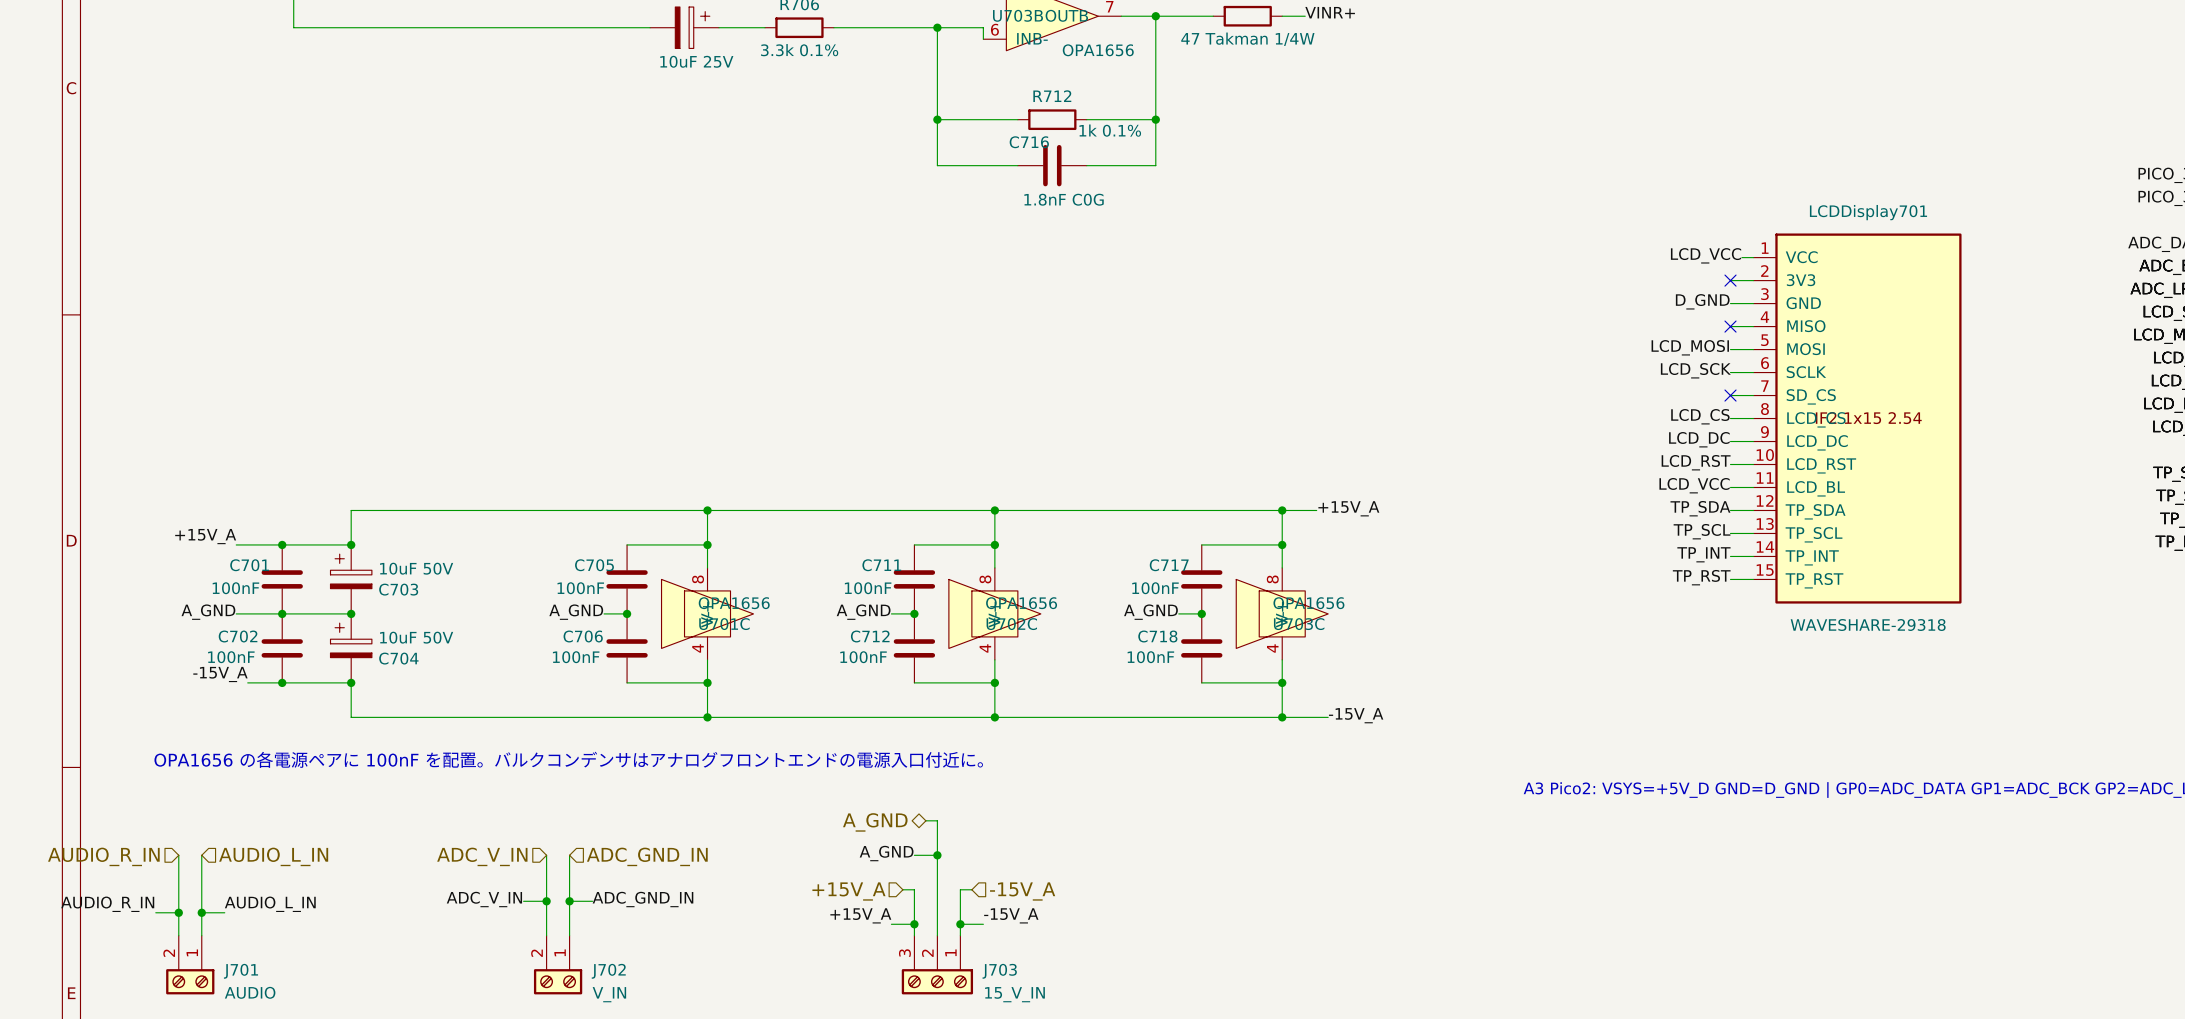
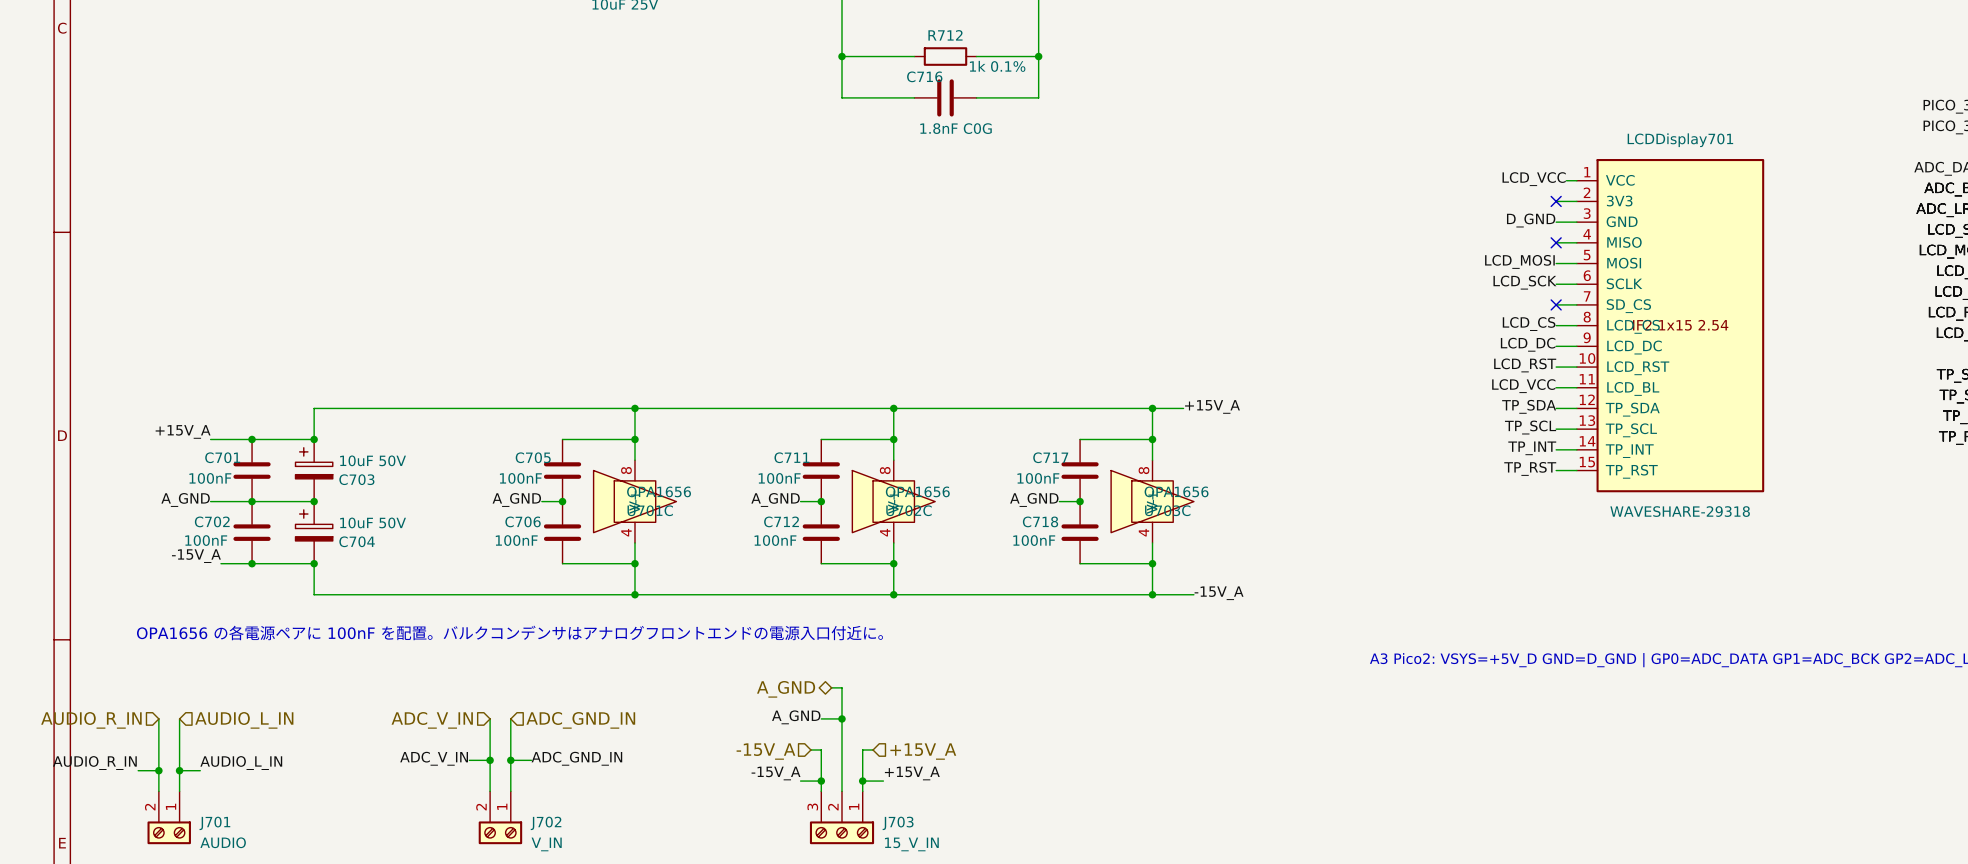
hierarchical label: +15V_A (848, 891) -> -15V_A (765, 751)
hierarchical label: -15V_A (1022, 891) -> +15V_A (923, 751)
label: +15V_A (860, 915) -> -15V_A (776, 773)
label: -15V_A (1011, 915) -> +15V_A (912, 773)

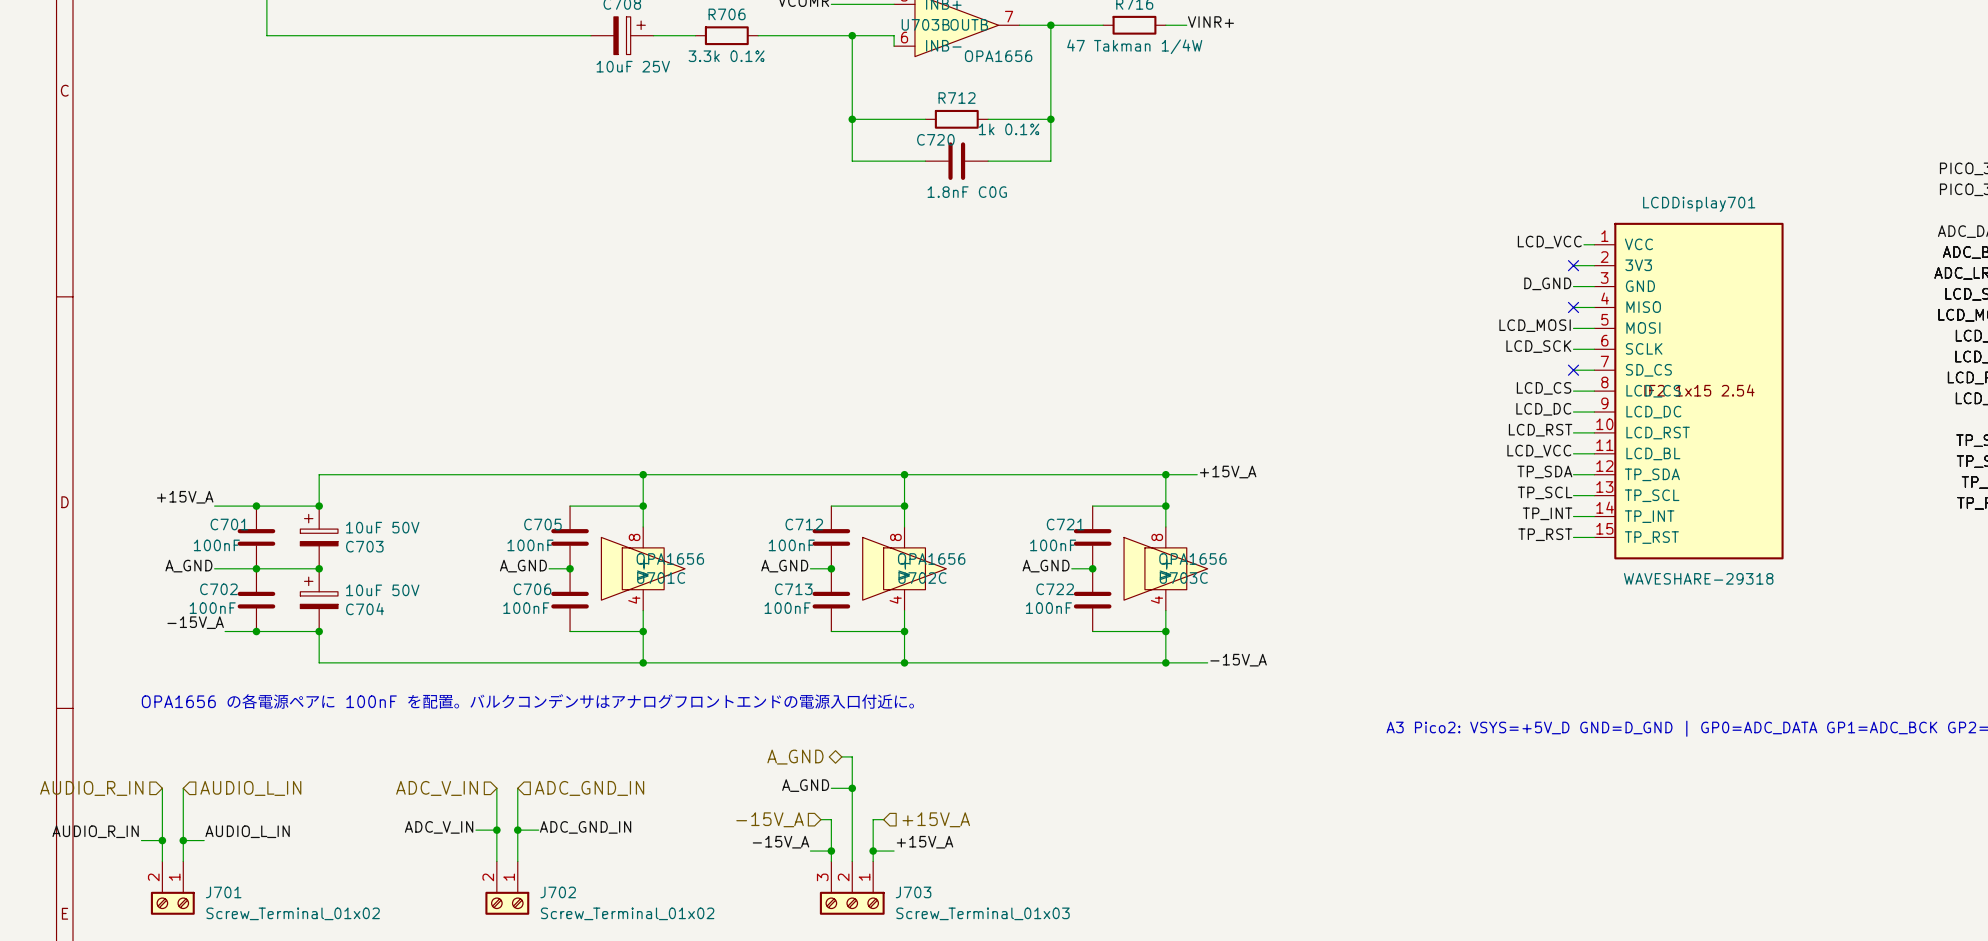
C716 name: C716 (924, 76) -> C720 (935, 139)
C711 name: C711 (791, 457) -> C712 (804, 524)
C717 name: C717 (1050, 457) -> C721 (1065, 524)
C712 name: C712 (781, 521) -> C713 (793, 589)
C718 name: C718 (1040, 521) -> C722 (1055, 589)
J701 value: AUDIO (223, 842) -> Screw_Terminal_01x02 (293, 913)
J702 value: V_IN (546, 844) -> Screw_Terminal_01x02 (627, 913)
J703 value: 15_V_IN (911, 844) -> Screw_Terminal_01x03 (983, 913)

